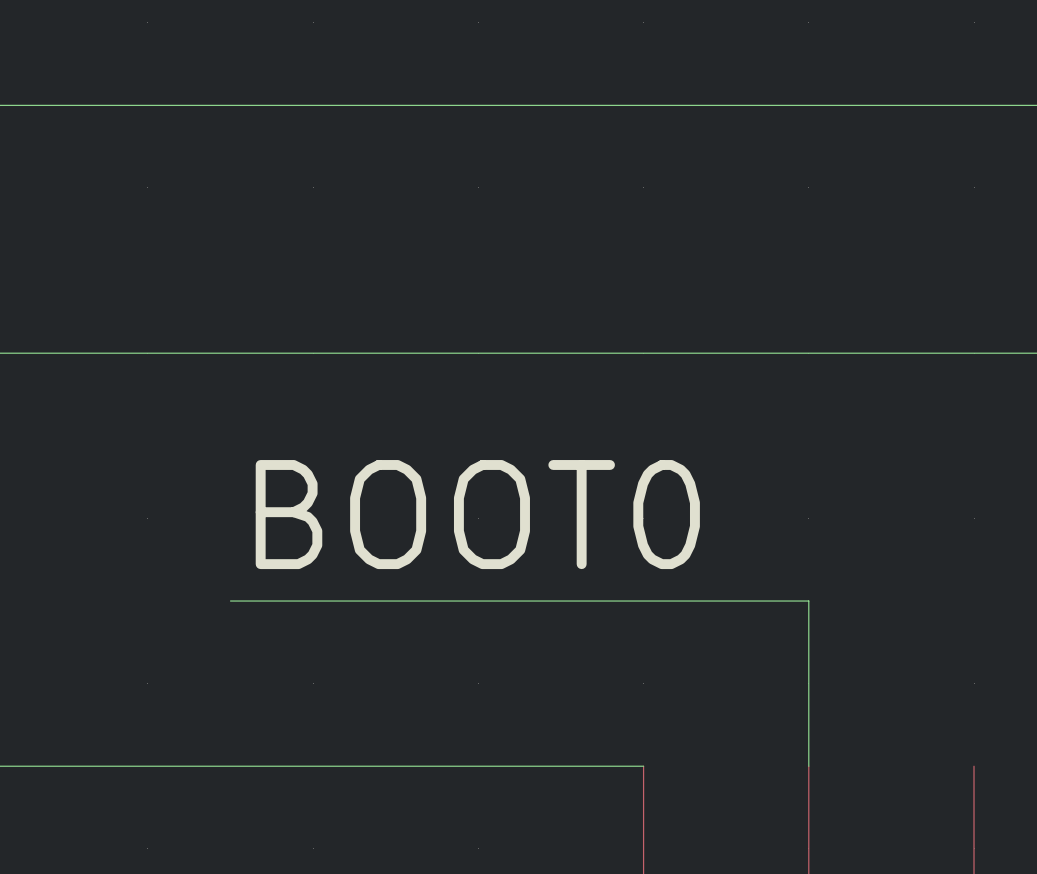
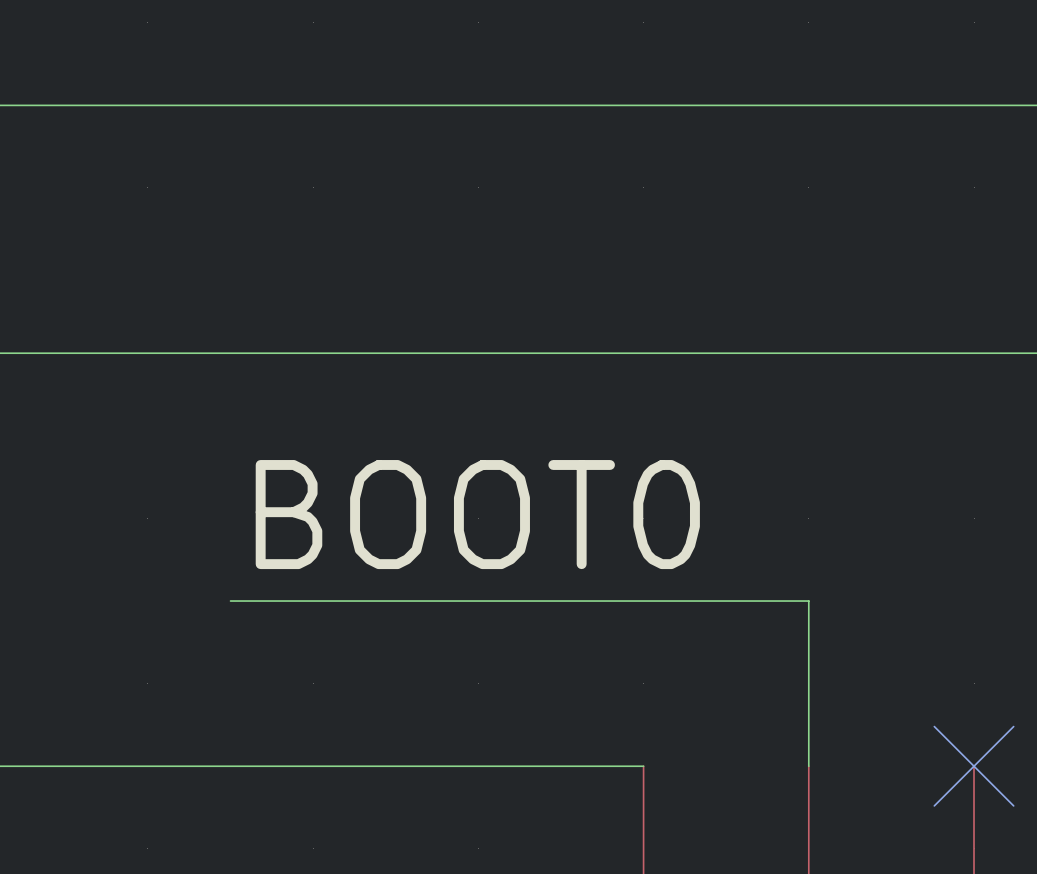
no-connect mark: none -> (974, 766)

